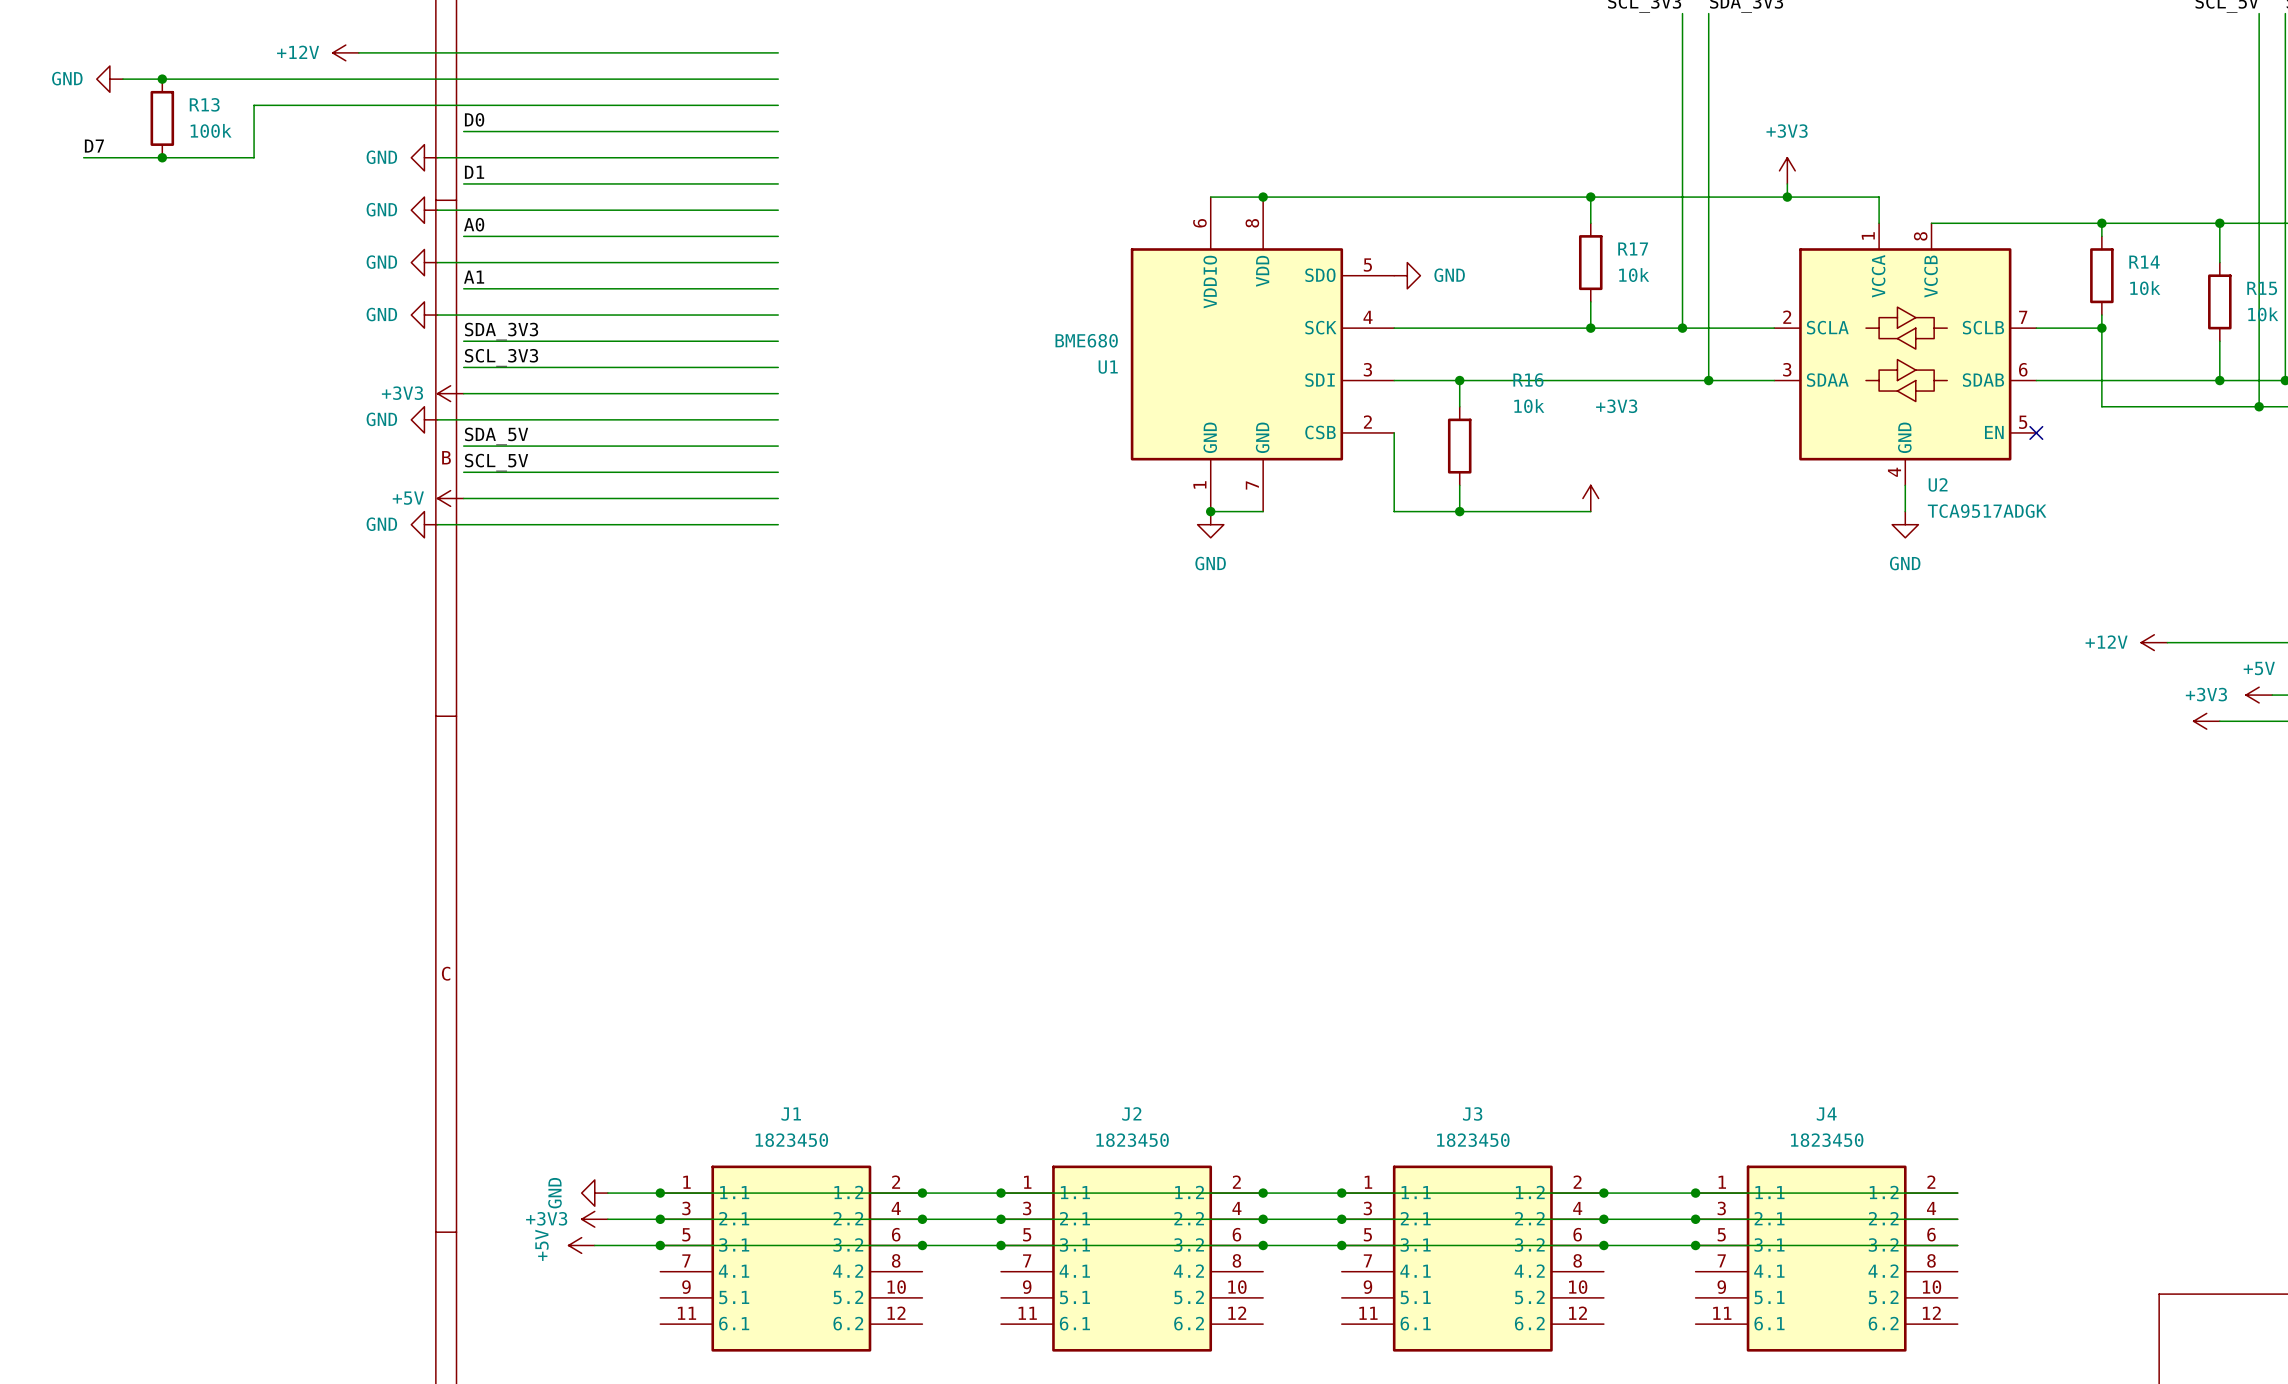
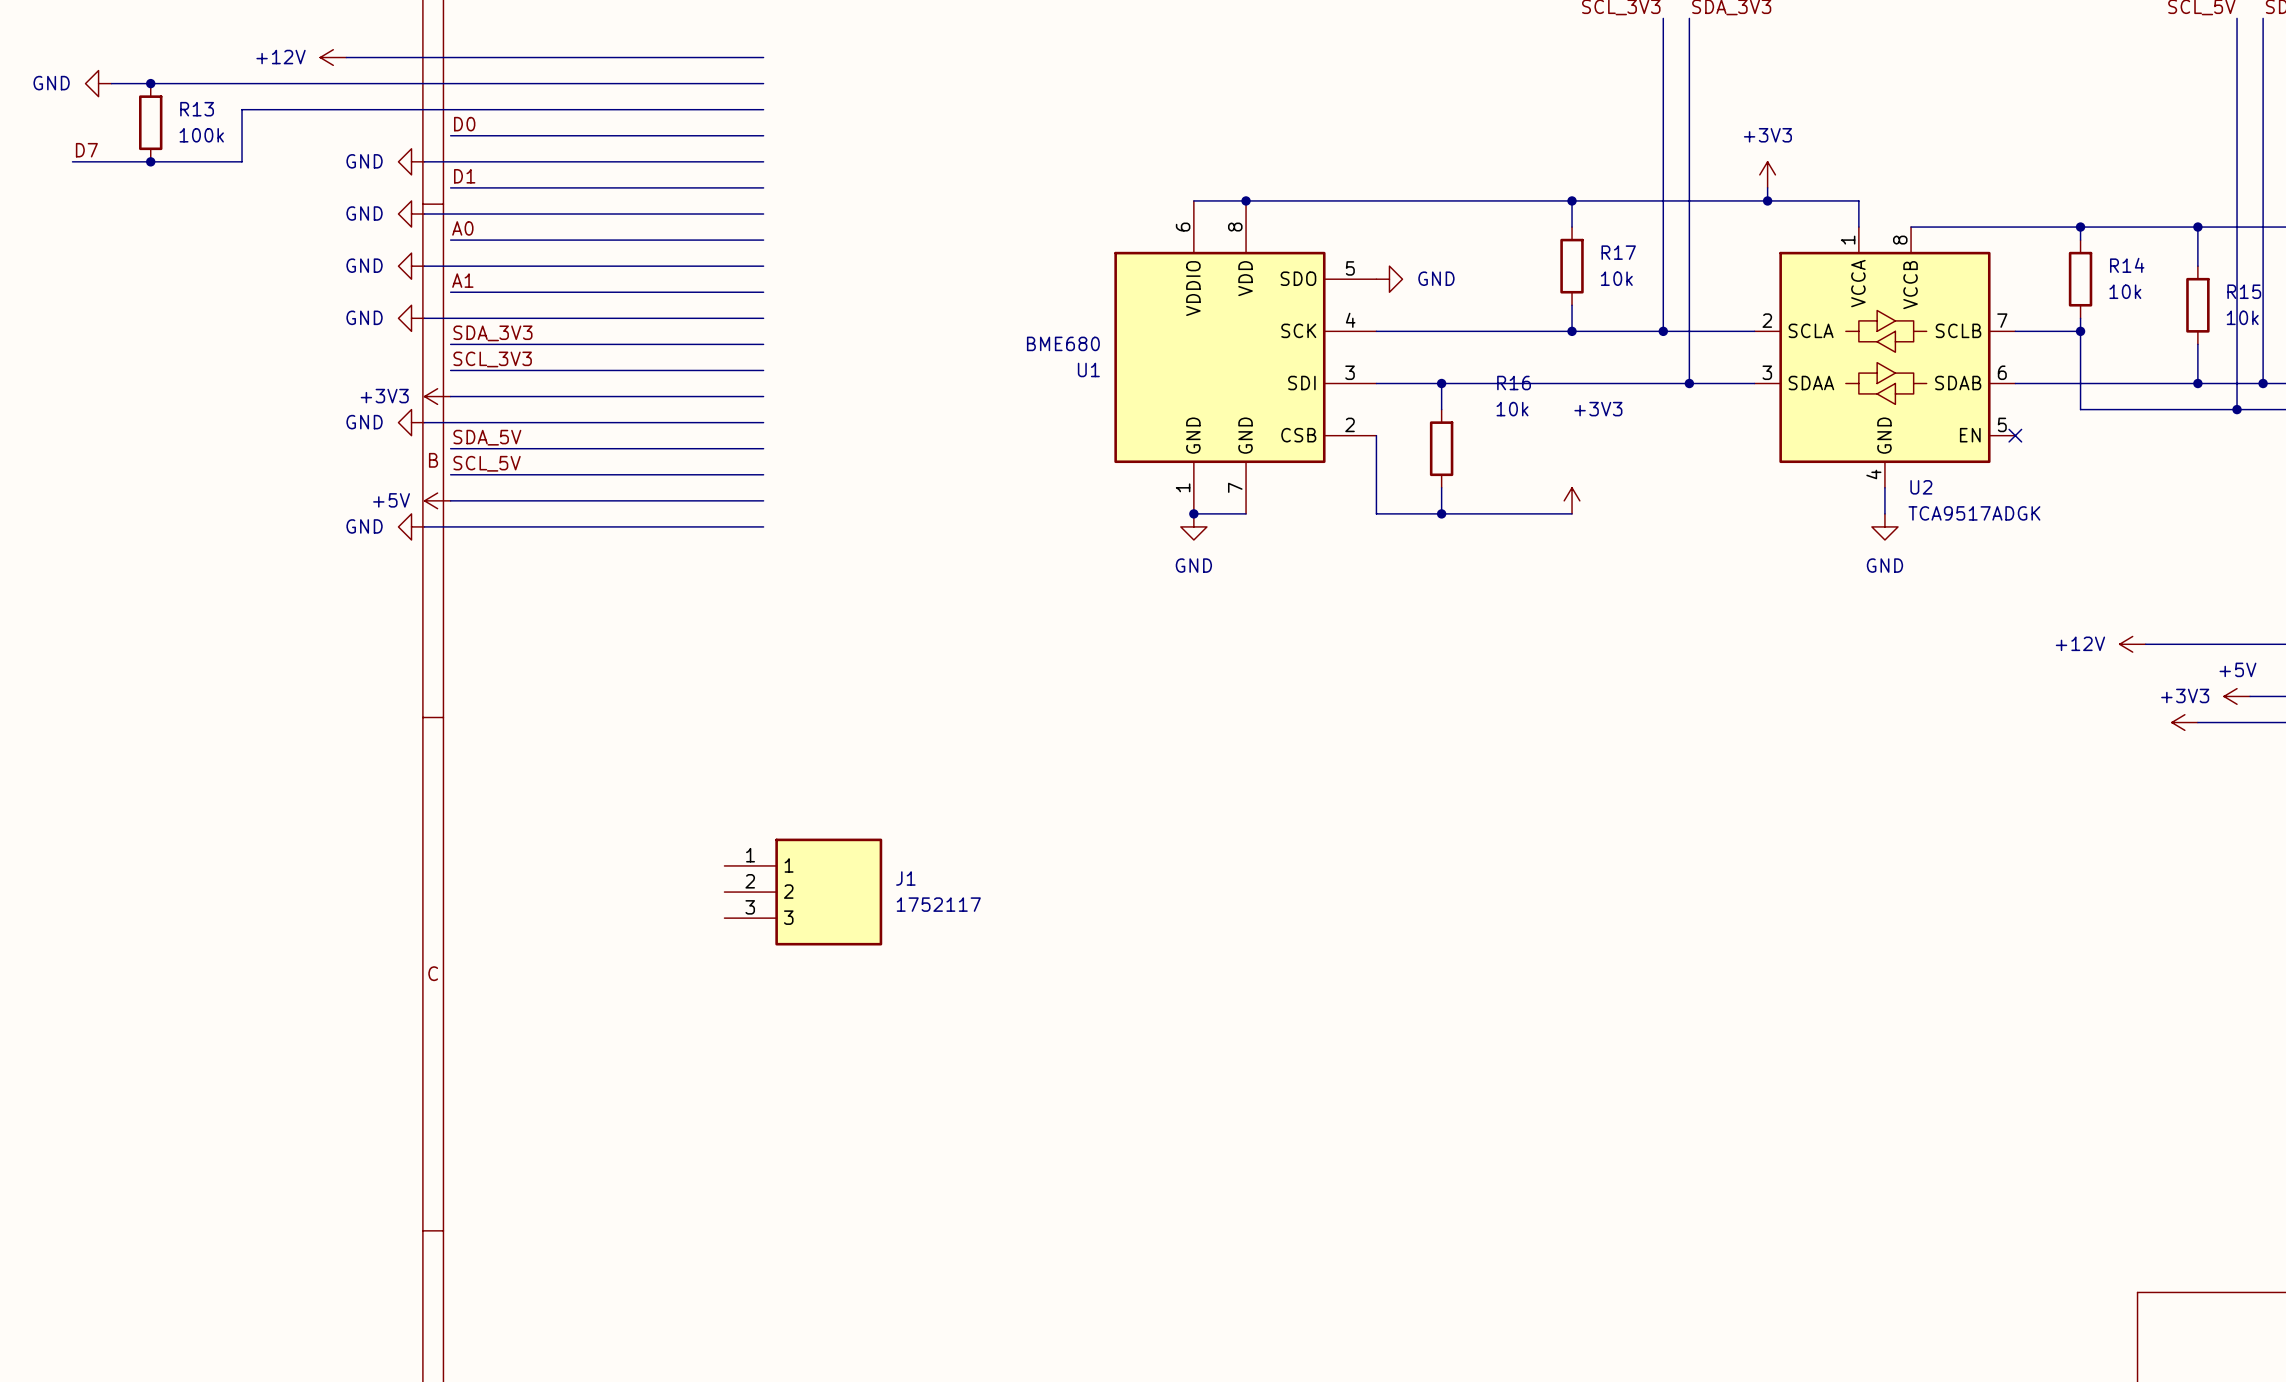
J1 name position: J1 (791, 1114) -> J1 (905, 878)
J1 value: 1823450 (791, 1140) -> 1752117 (938, 904)
J1 symbol: [660, 1165, 923, 1352] -> [724, 838, 883, 946]
power symbol: GND (594, 1193) -> none
wire: (607, 1193) (1957, 1193) -> none
junction: (660, 1193) -> none
junction: (922, 1193) -> none
junction: (1001, 1193) -> none
junction: (1263, 1193) -> none
junction: (1341, 1193) -> none
junction: (1603, 1193) -> none
junction: (1695, 1193) -> none
power symbol: +3V3 (594, 1219) -> none
wire: (607, 1219) (1957, 1219) -> none
junction: (660, 1219) -> none
junction: (922, 1219) -> none
junction: (1001, 1219) -> none
junction: (1263, 1219) -> none
junction: (1341, 1219) -> none
junction: (1603, 1219) -> none
junction: (1695, 1219) -> none
power symbol: +5V (581, 1245) -> none
wire: (594, 1245) (1957, 1245) -> none
junction: (660, 1245) -> none
junction: (922, 1245) -> none
junction: (1001, 1245) -> none
junction: (1263, 1245) -> none
junction: (1341, 1245) -> none
junction: (1603, 1245) -> none
junction: (1695, 1245) -> none
J2: 1823450 (1132, 1258) -> none
J3: 1823450 (1472, 1258) -> none
J4: 1823450 (1826, 1258) -> none

